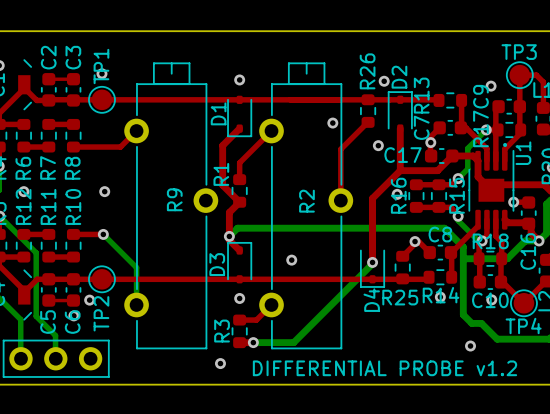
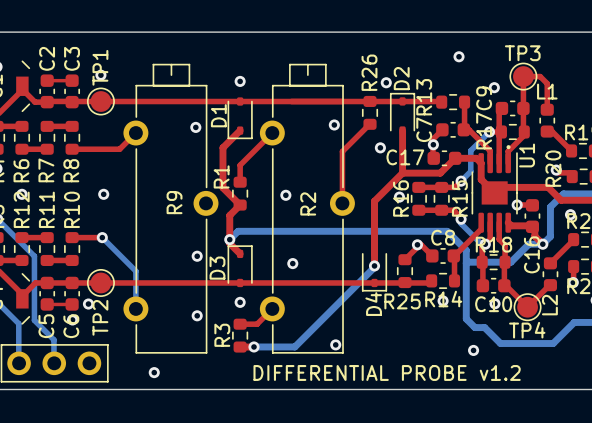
via: none -> (459, 56)
via: none -> (195, 127)
via: none -> (285, 195)
via: none -> (197, 256)
via: none -> (197, 315)
via: none -> (335, 344)
via: (220, 363) -> none
via: none -> (154, 372)

